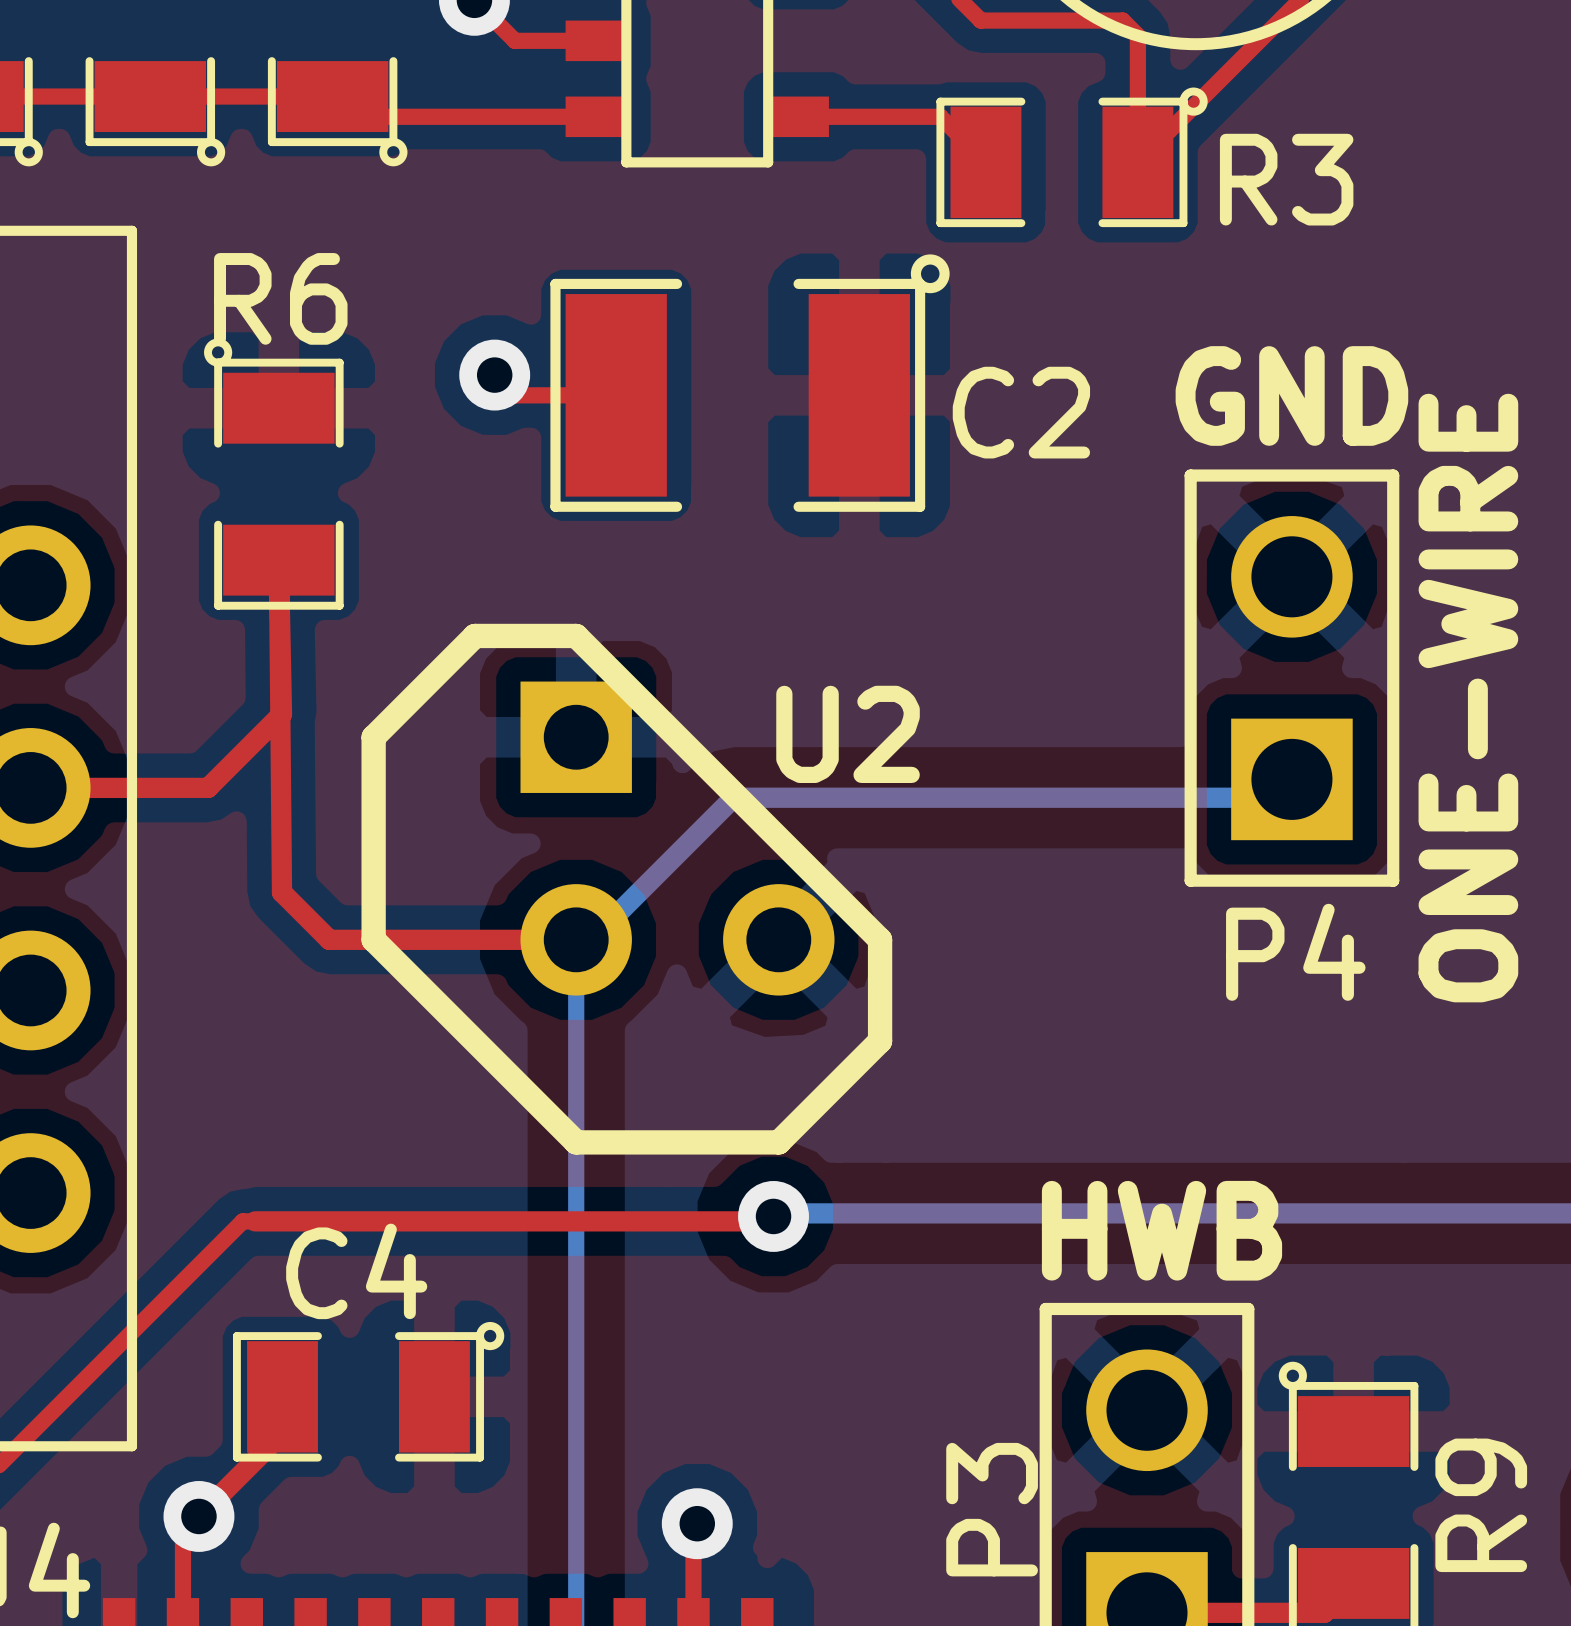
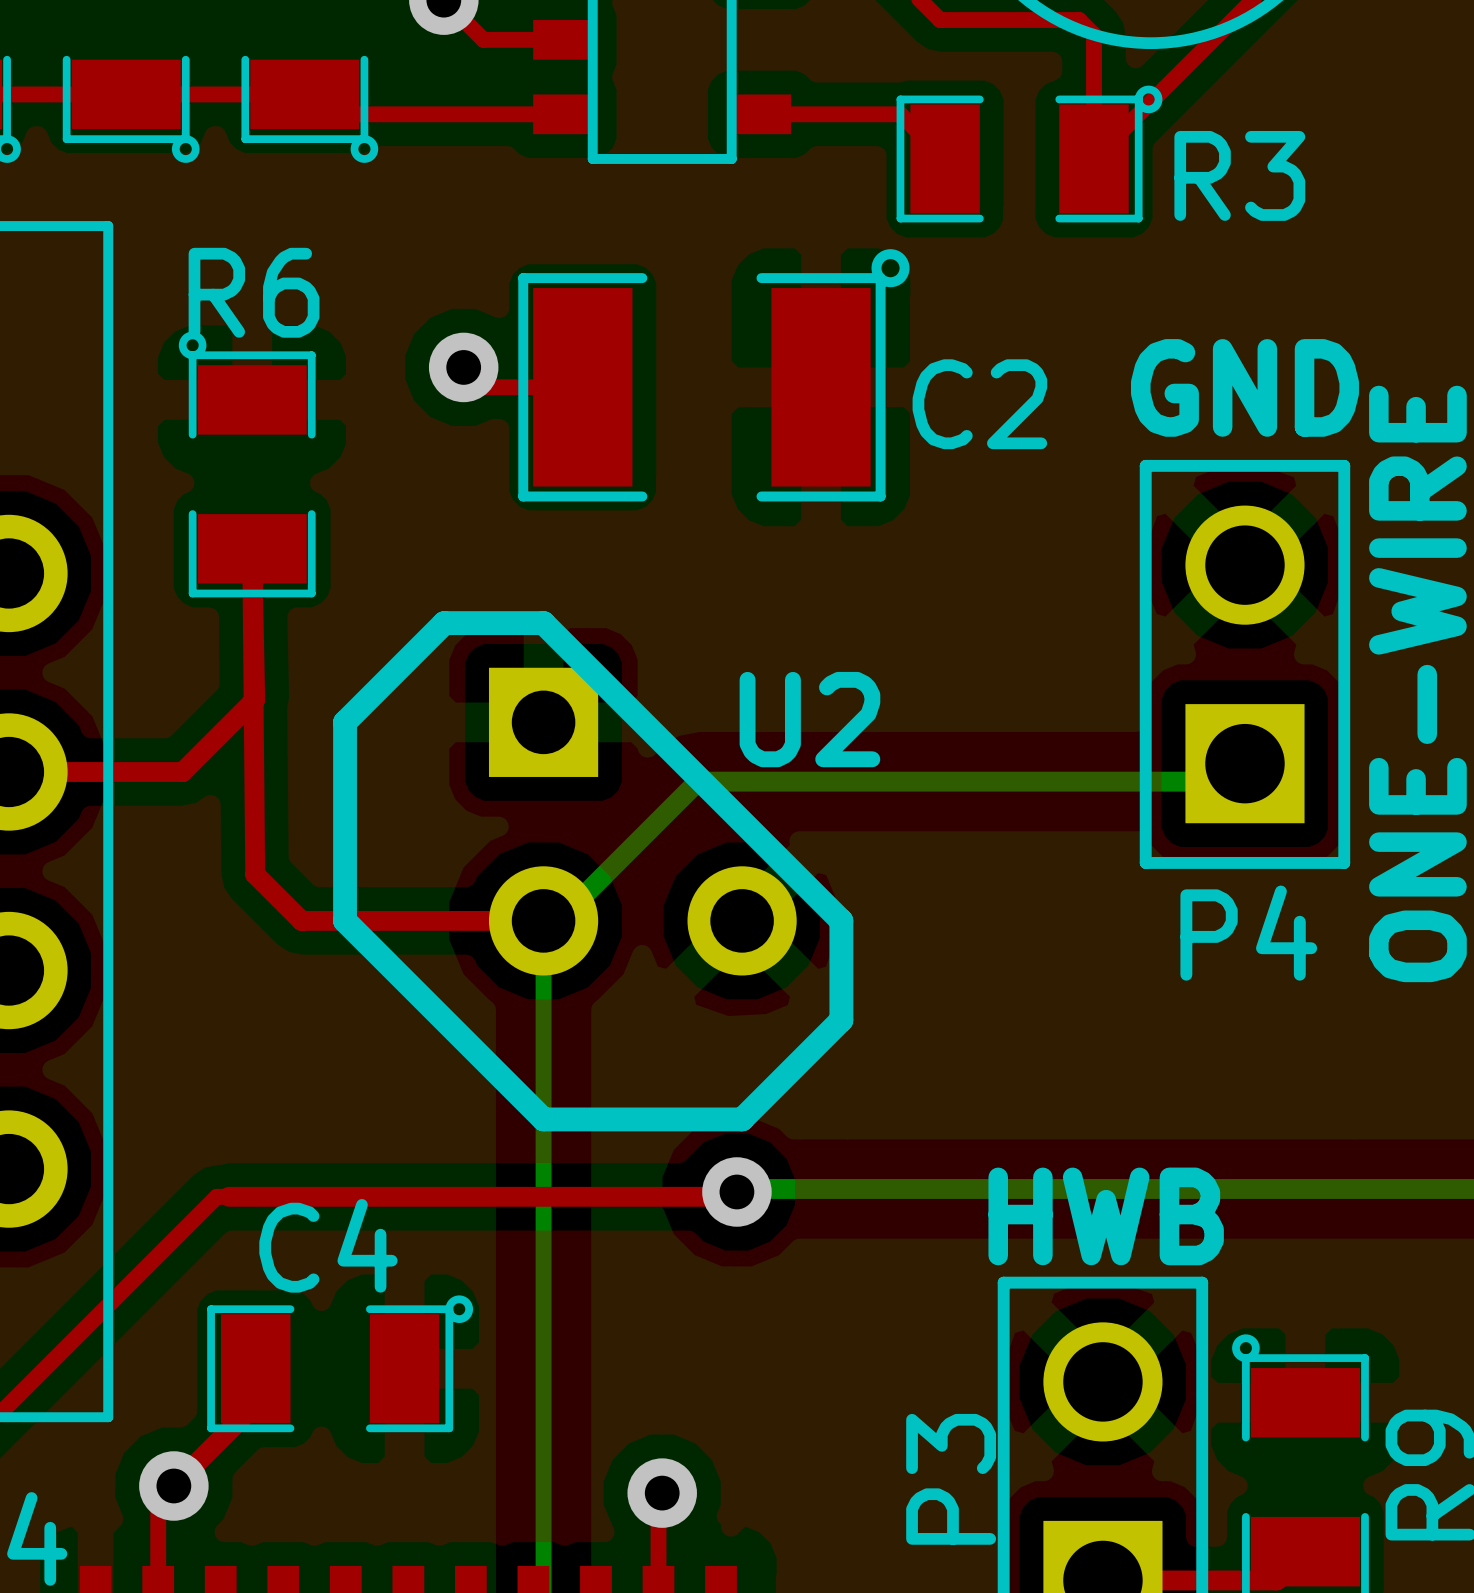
text position: HWB (1161, 1230) -> HWB (1106, 1216)

